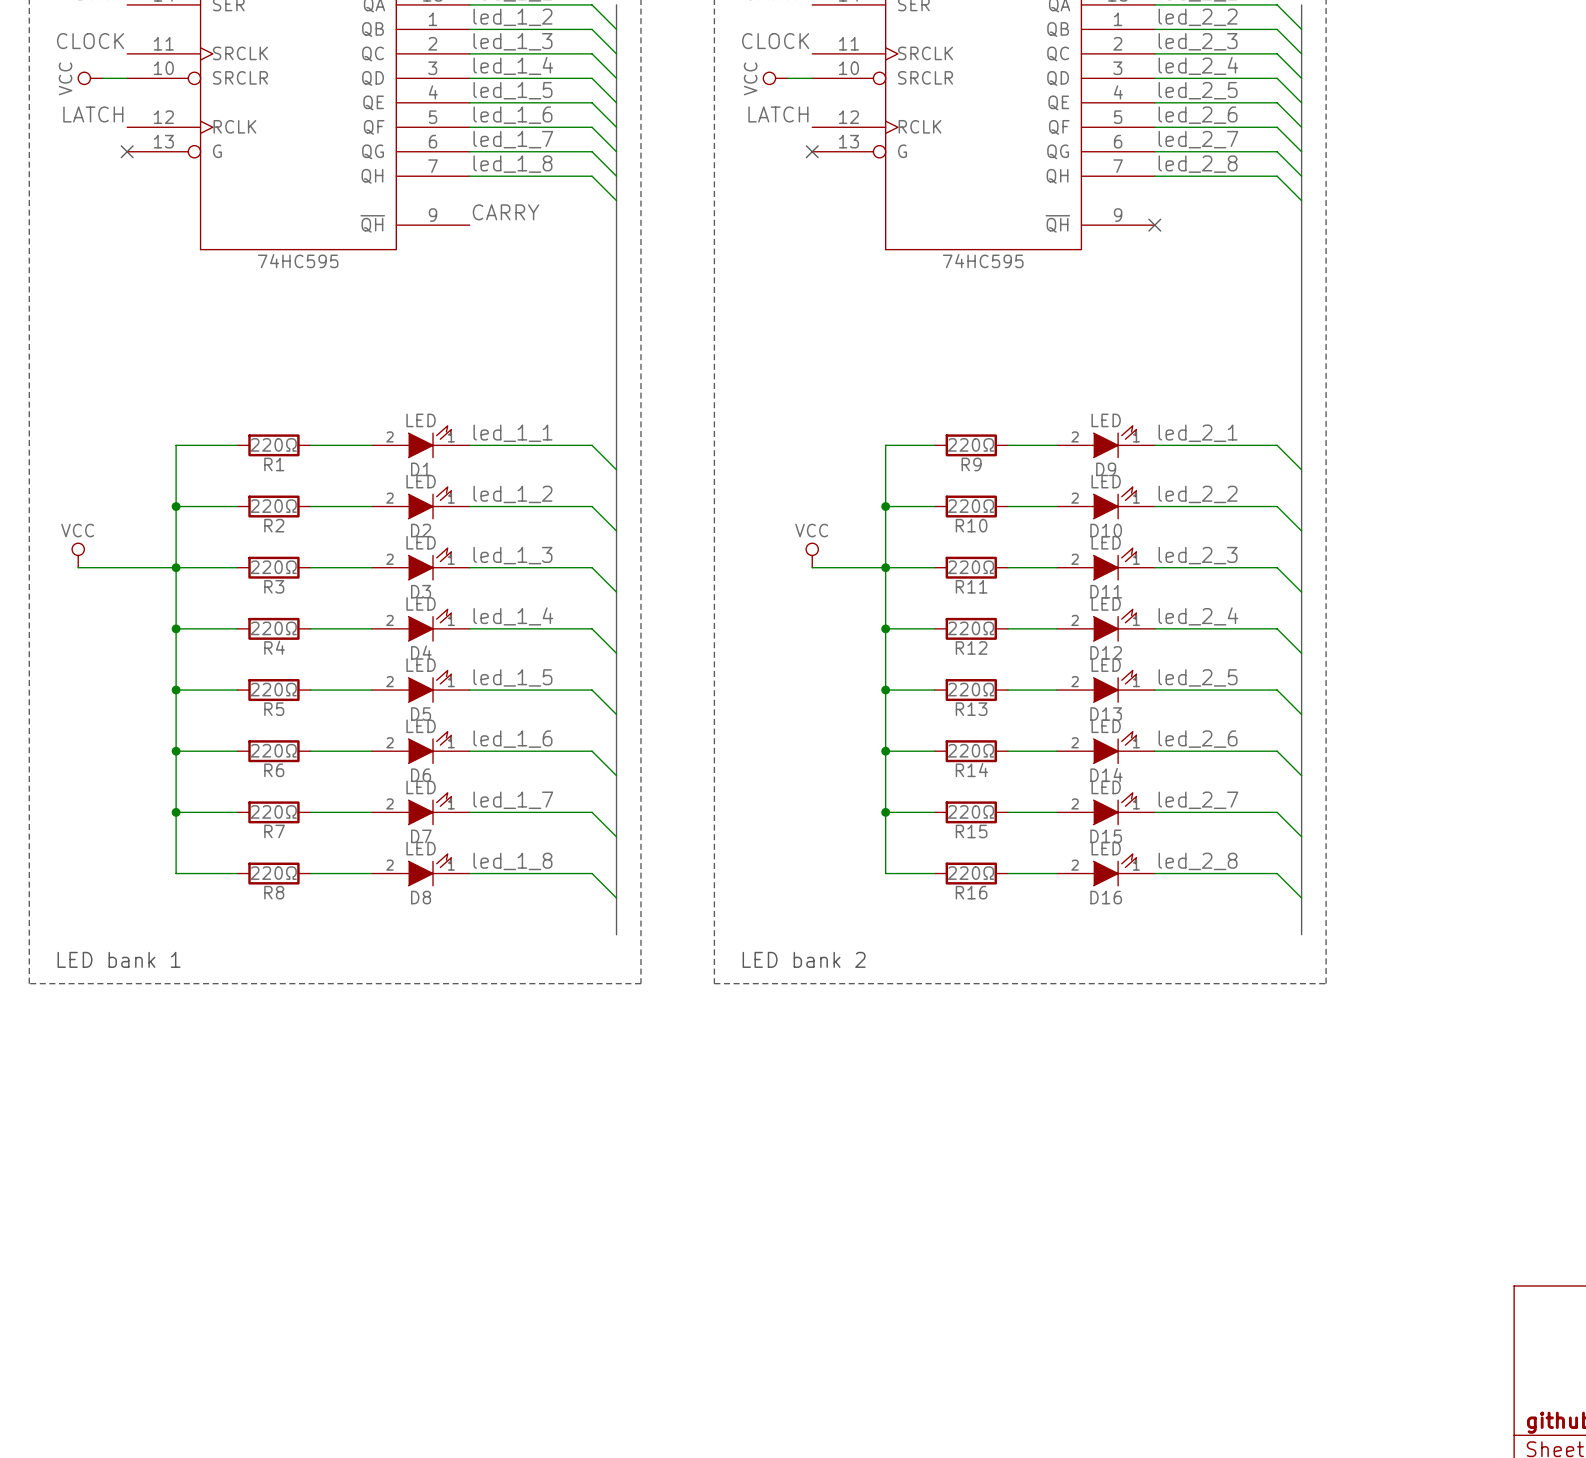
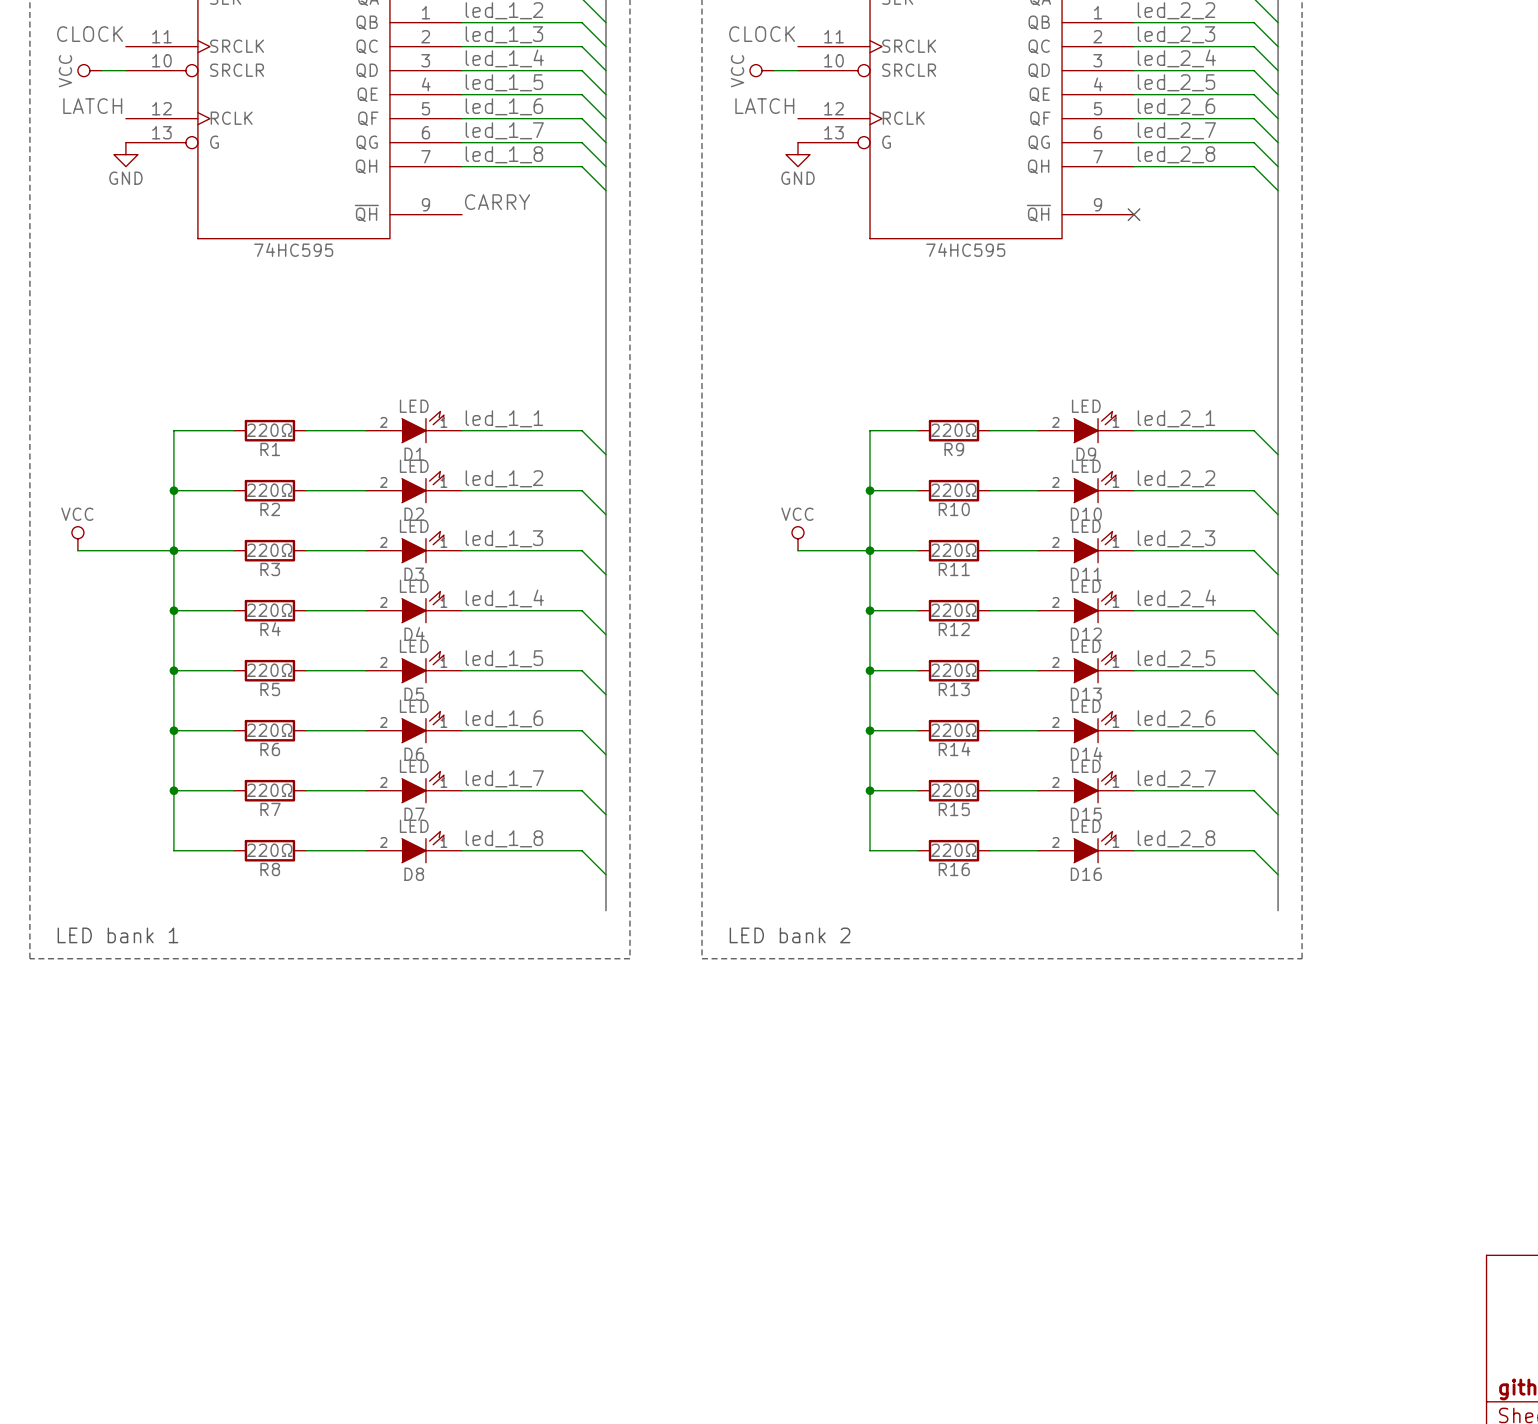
no-connect mark: (127, 151) -> none
no-connect mark: (812, 151) -> none
power symbol: none -> GND (125, 154)
power symbol: none -> GND (798, 154)

